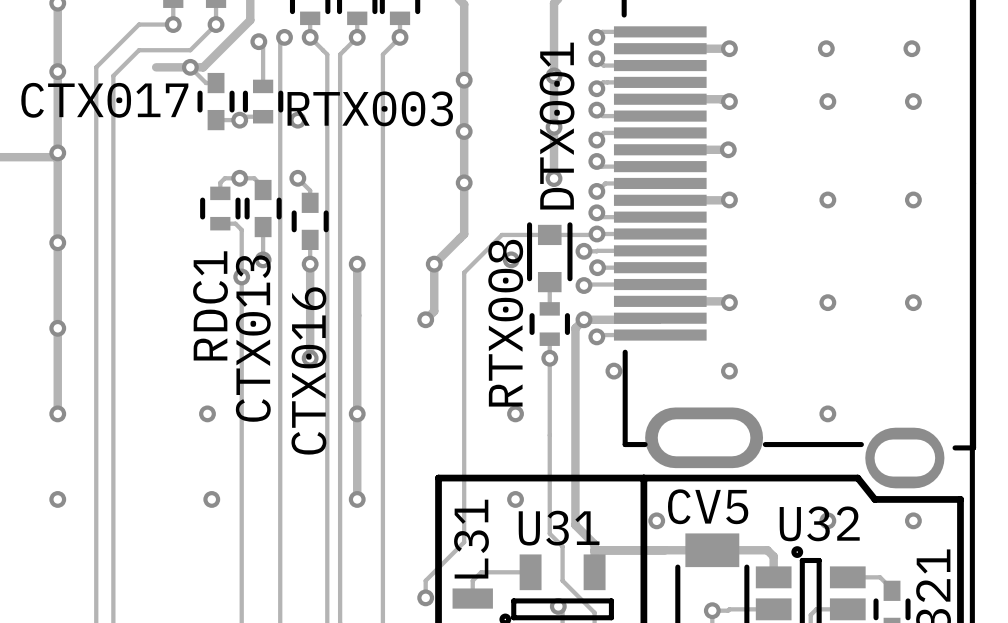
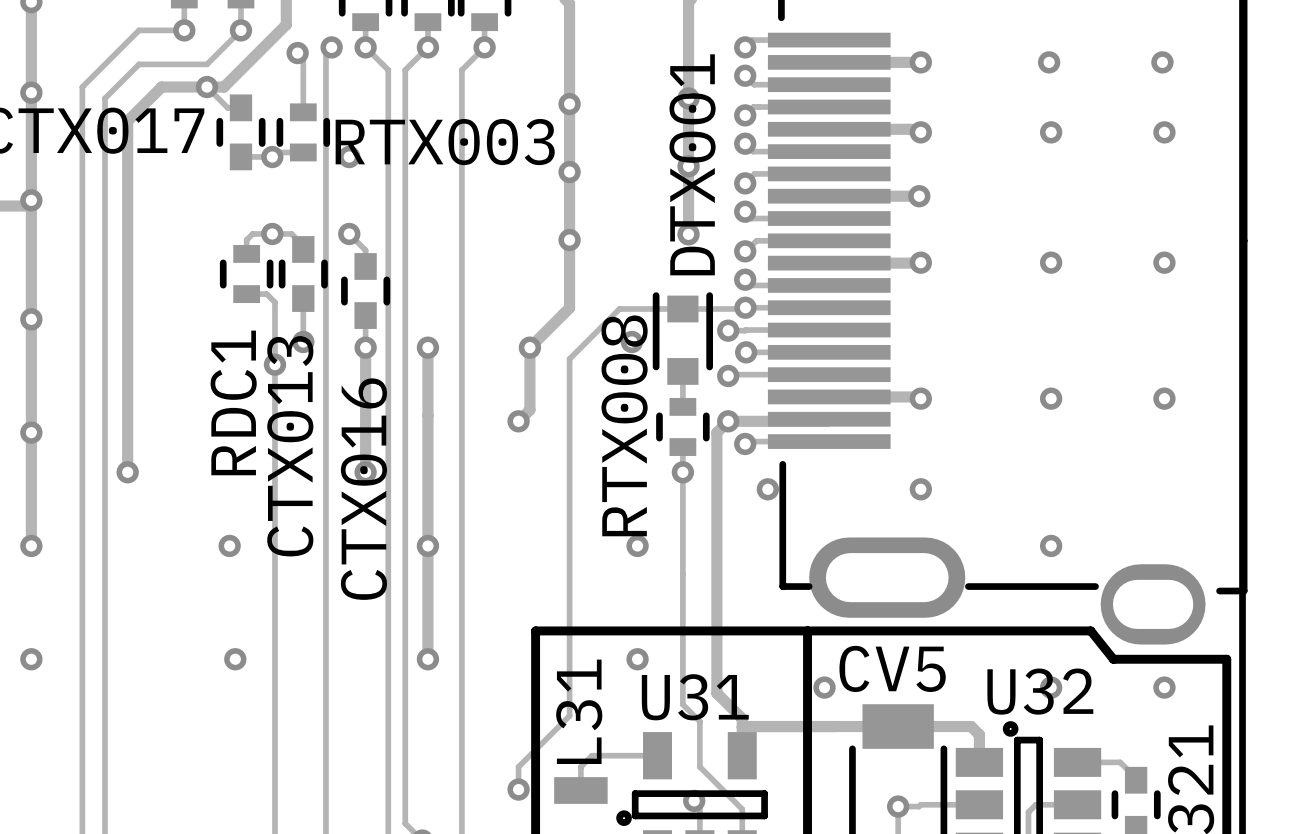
track: none -> (161, 87) (127, 121) (127, 472)
via: none -> (127, 472)

